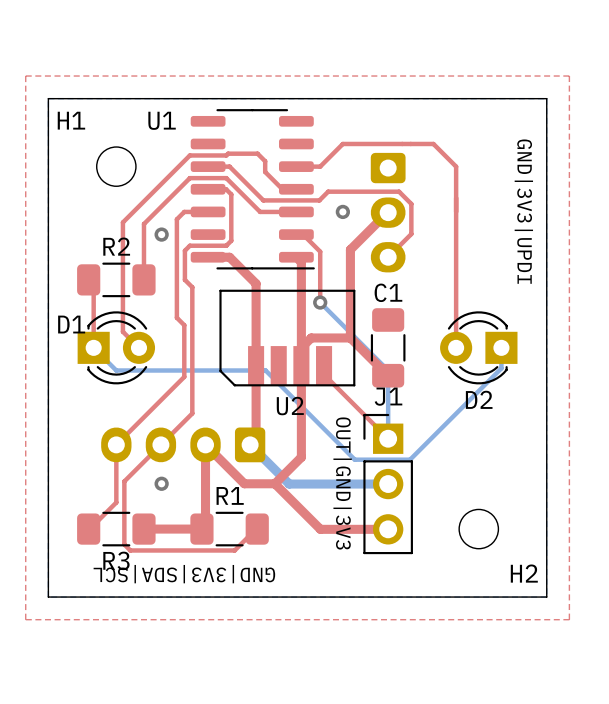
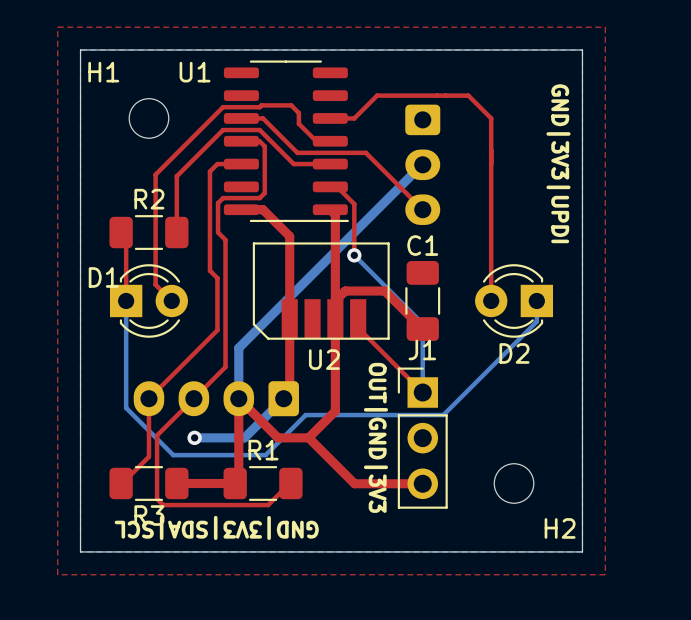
top track: (263, 200) (319, 200) (328, 191) (399, 191) (411, 203) (411, 234) (388, 257) -> (297, 152) (365, 152) (422, 209)
via: (342, 211) -> none
top track: (388, 212) (350, 249) (350, 337) -> none
bottom track: none -> (422, 164) (238, 348) (238, 398)
via: (161, 234) -> none
bottom track: (93, 347) (116, 370) (265, 370) (354, 459) (410, 459) -> (126, 300) (126, 407) (173, 455) (265, 455) (305, 415) (444, 413)
bottom track: (250, 444) (289, 484) (388, 484) -> (283, 398) (244, 437) (194, 437)

